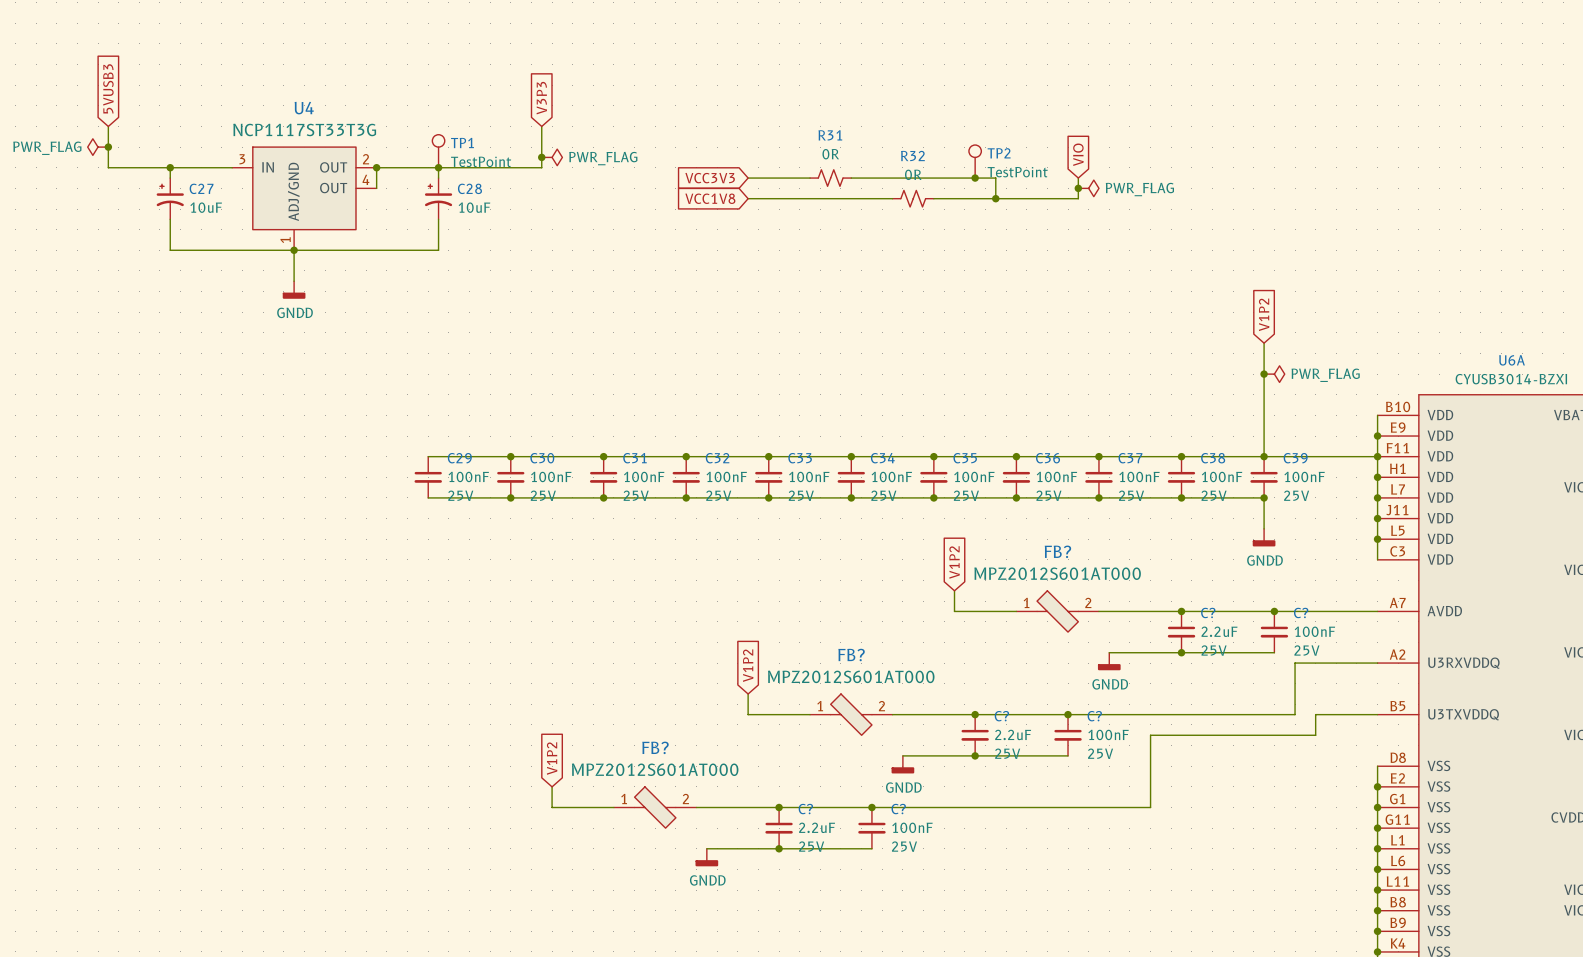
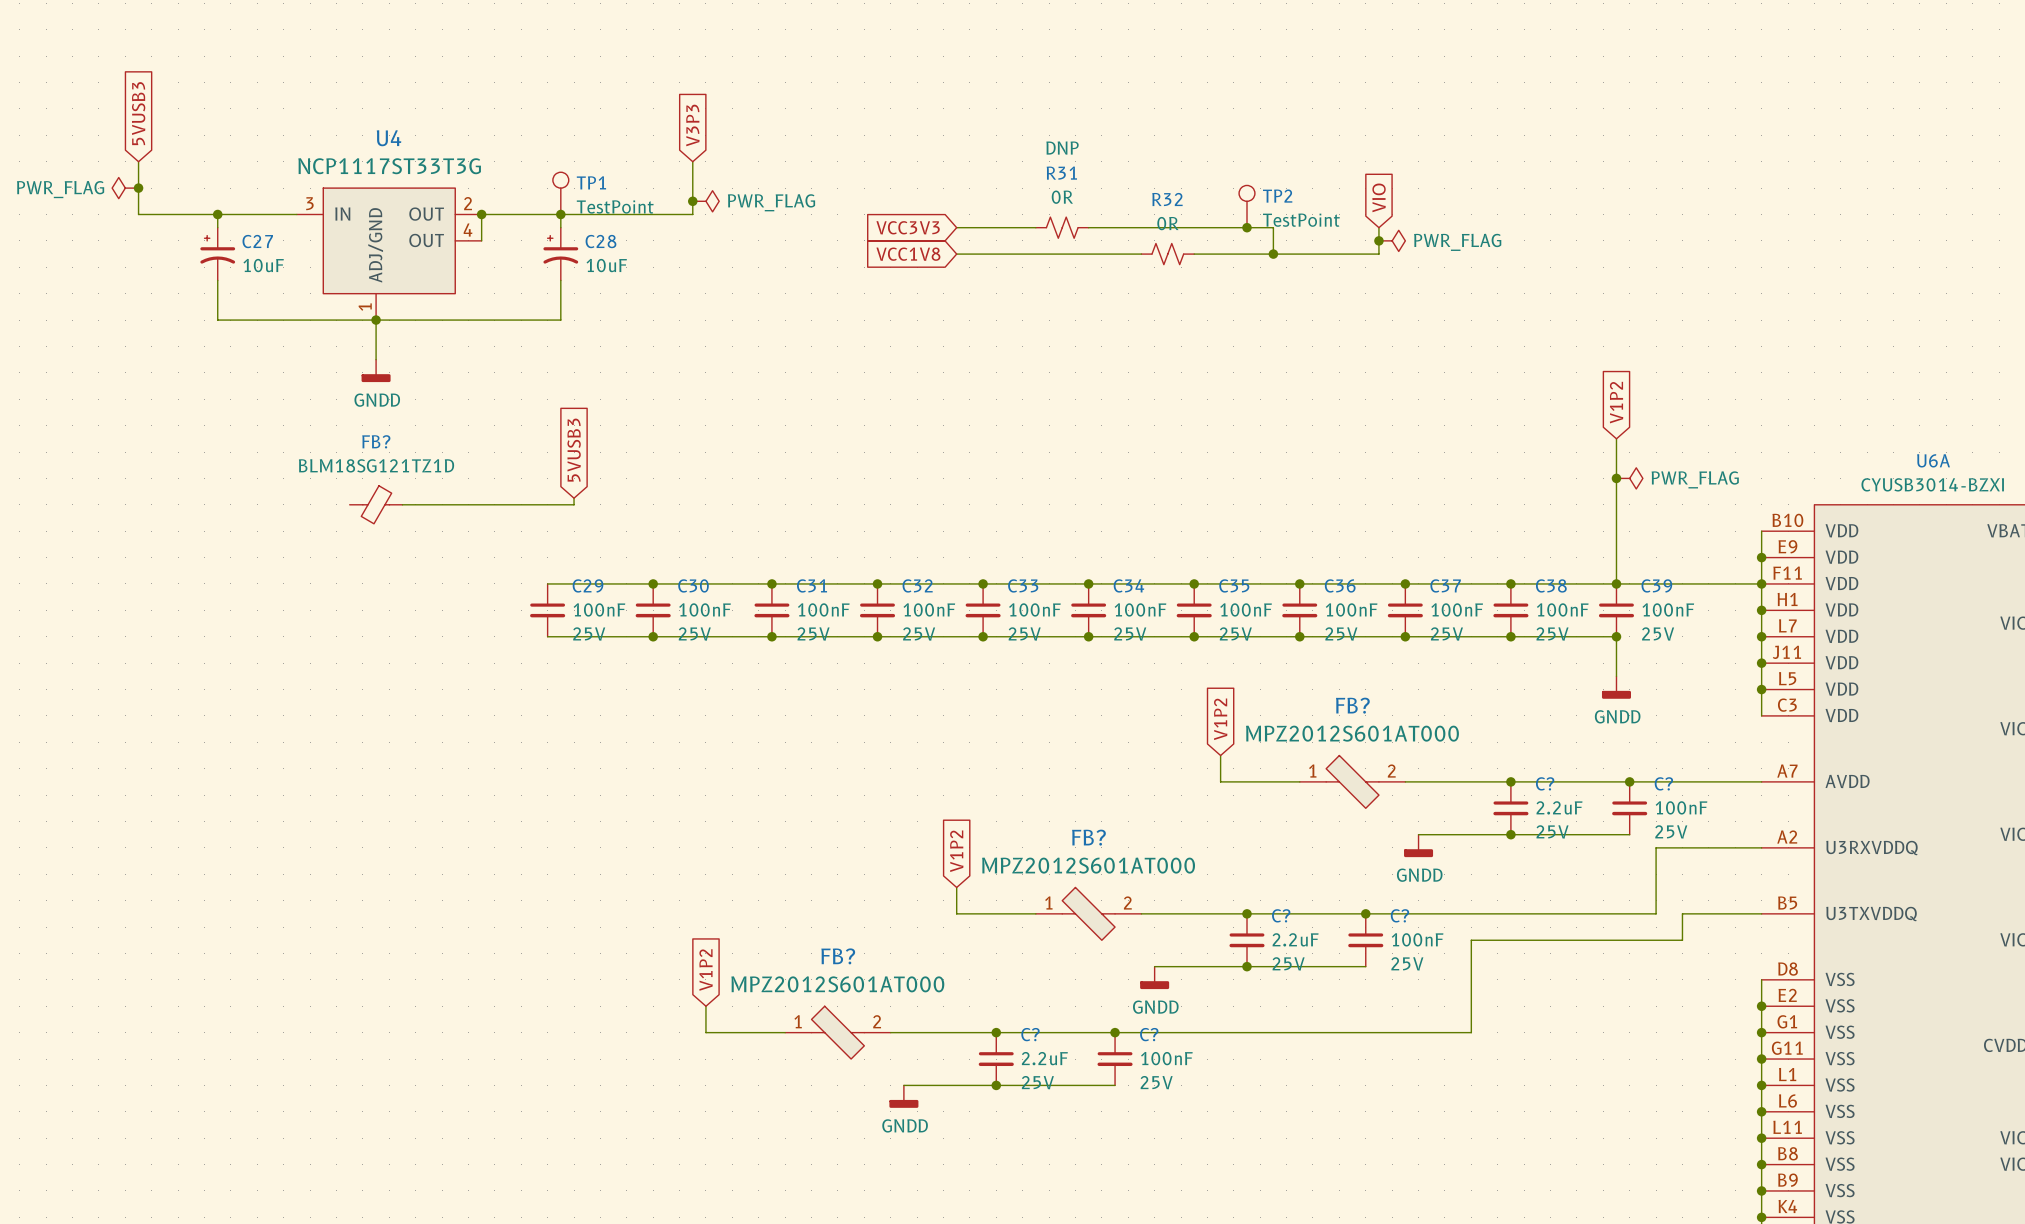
R31 text: none -> DNP (1062, 148)
global label: none -> 5VUSB3 (574, 450)
wire: none -> (574, 498) (574, 504) (402, 504)
FB?: none -> BLM18SG121TZ1D (376, 504)

